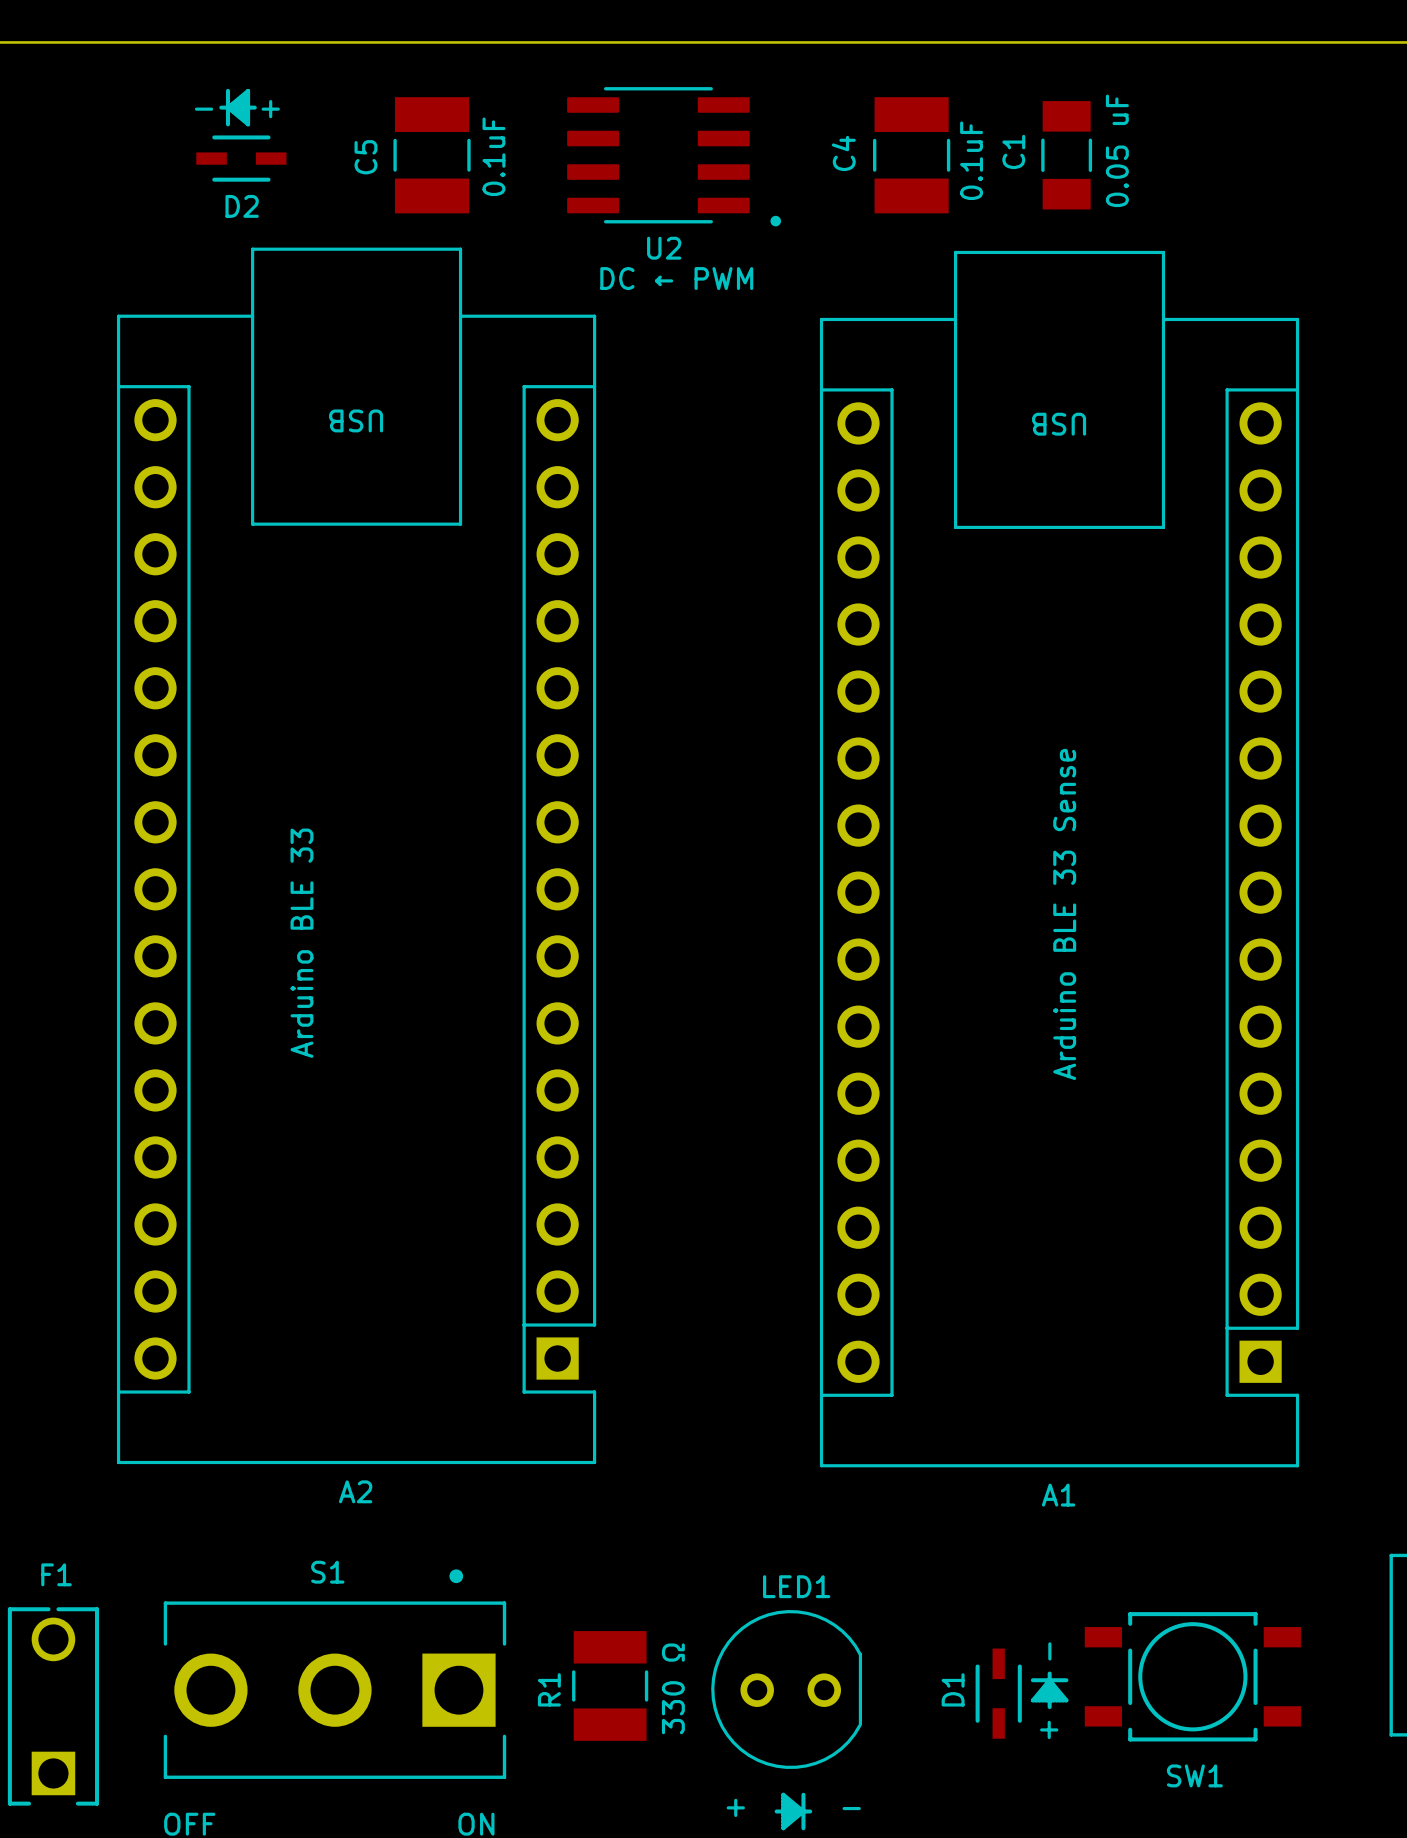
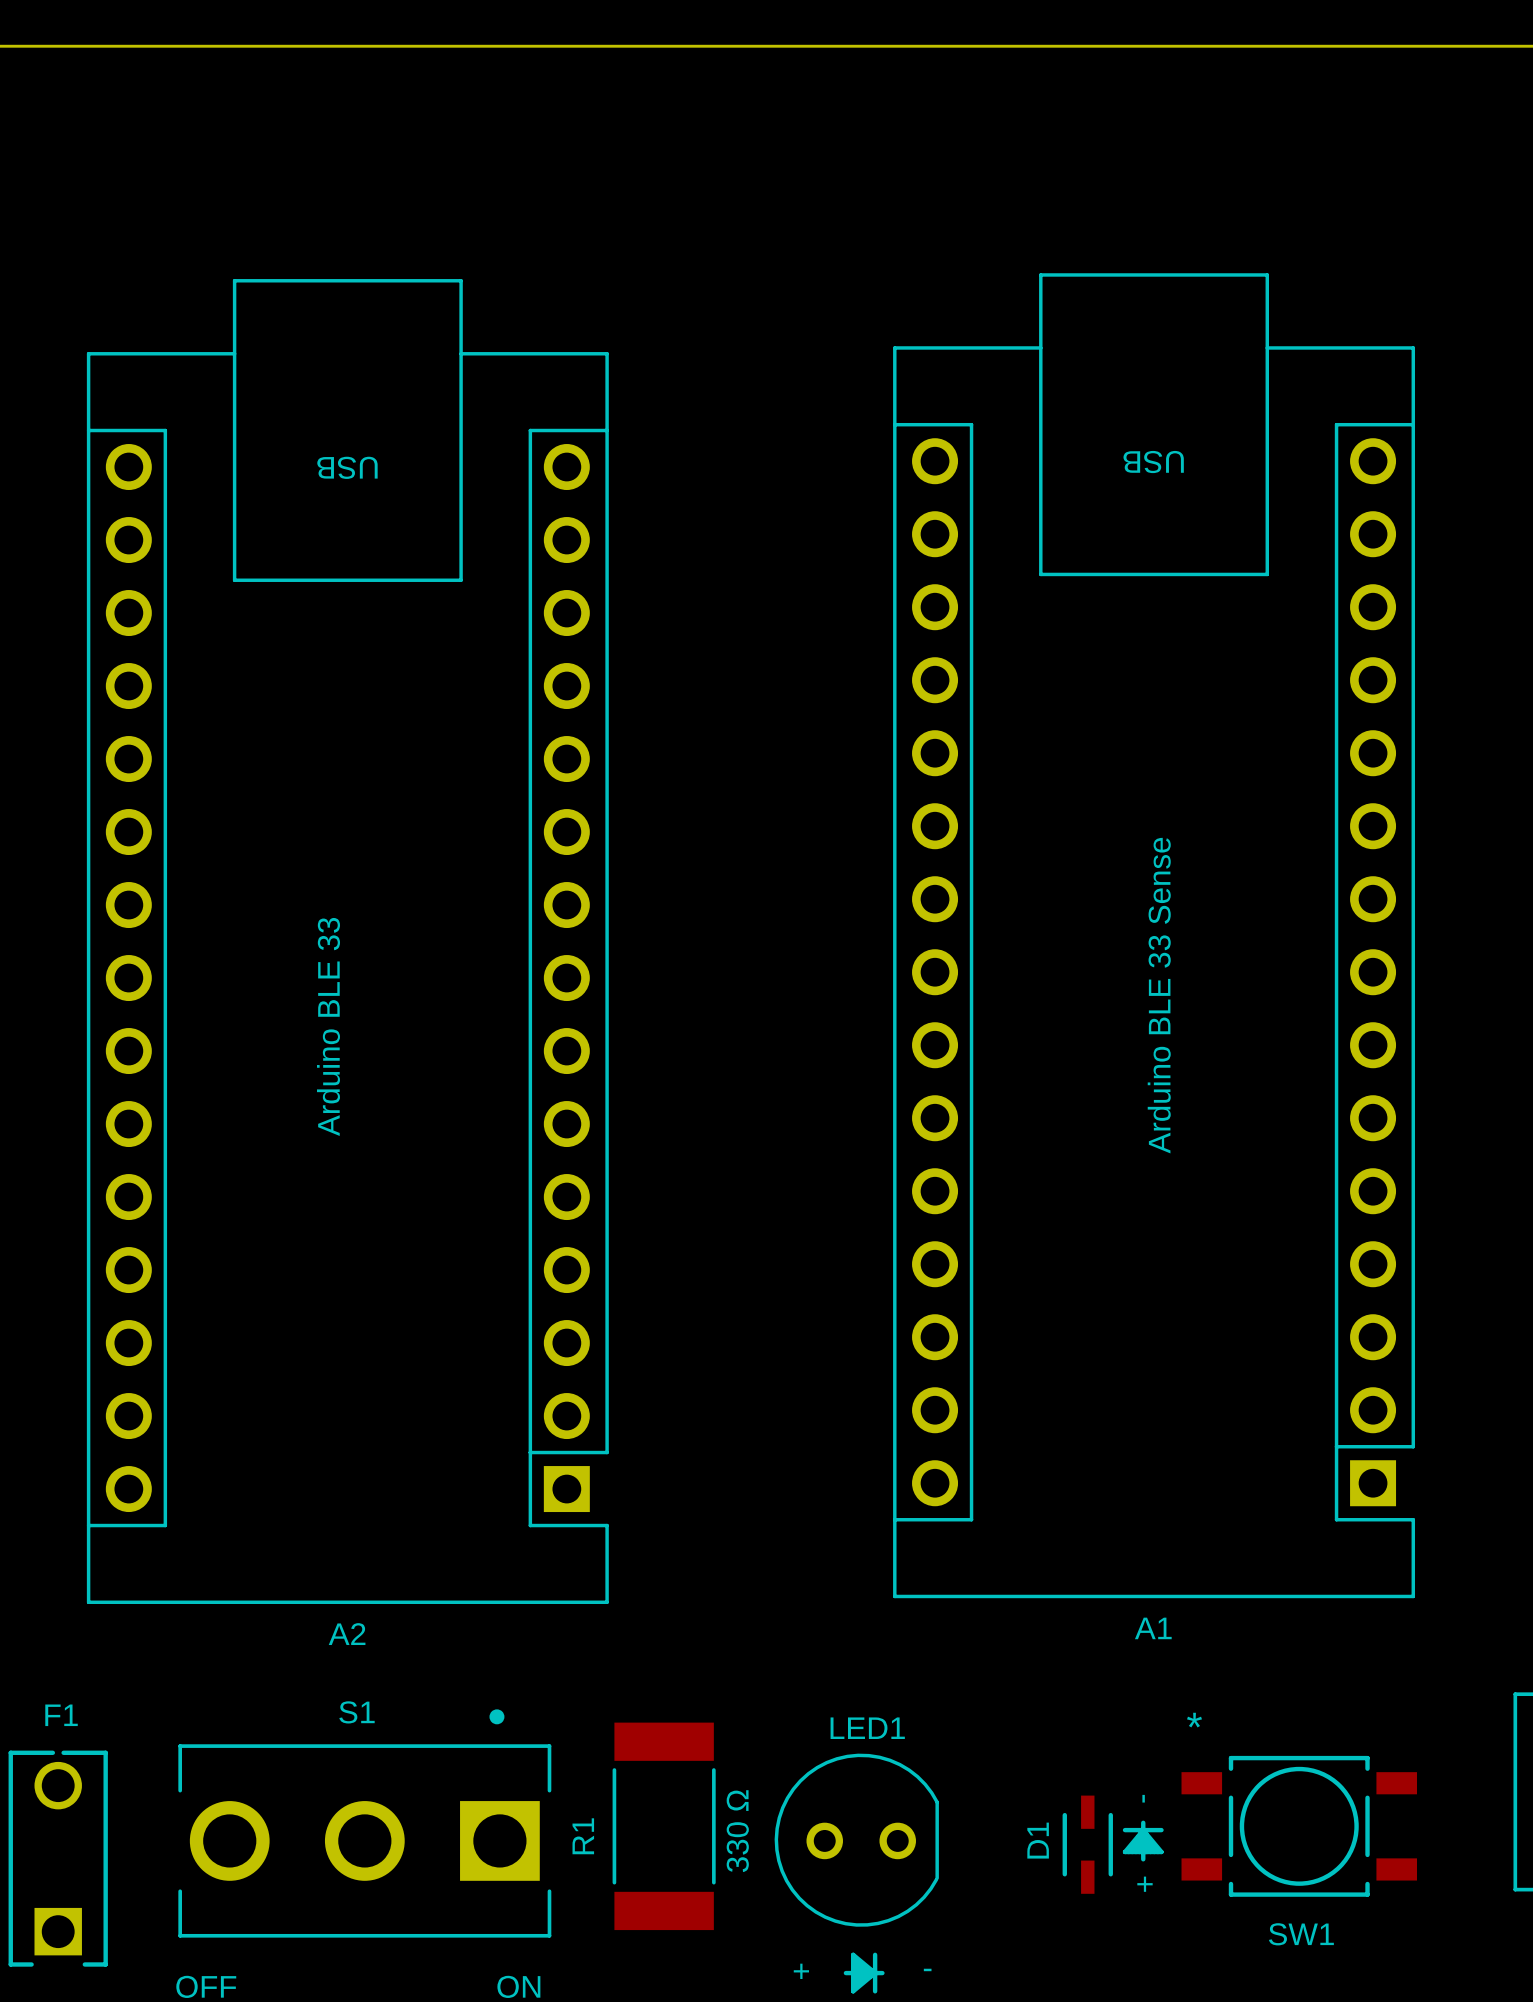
D2: (241, 135) -> none
C5: (432, 155) -> none
C4: (911, 155) -> none
C1: (1066, 155) -> none
U2: (674, 156) -> none
text: DC ← PWM (676, 278) -> none
A2 position: (356, 855) -> (347, 941)
SW1 text: none -> * (1194, 1720)
R1 footprint: [572, 1631, 649, 1741] -> [612, 1722, 716, 1931]

